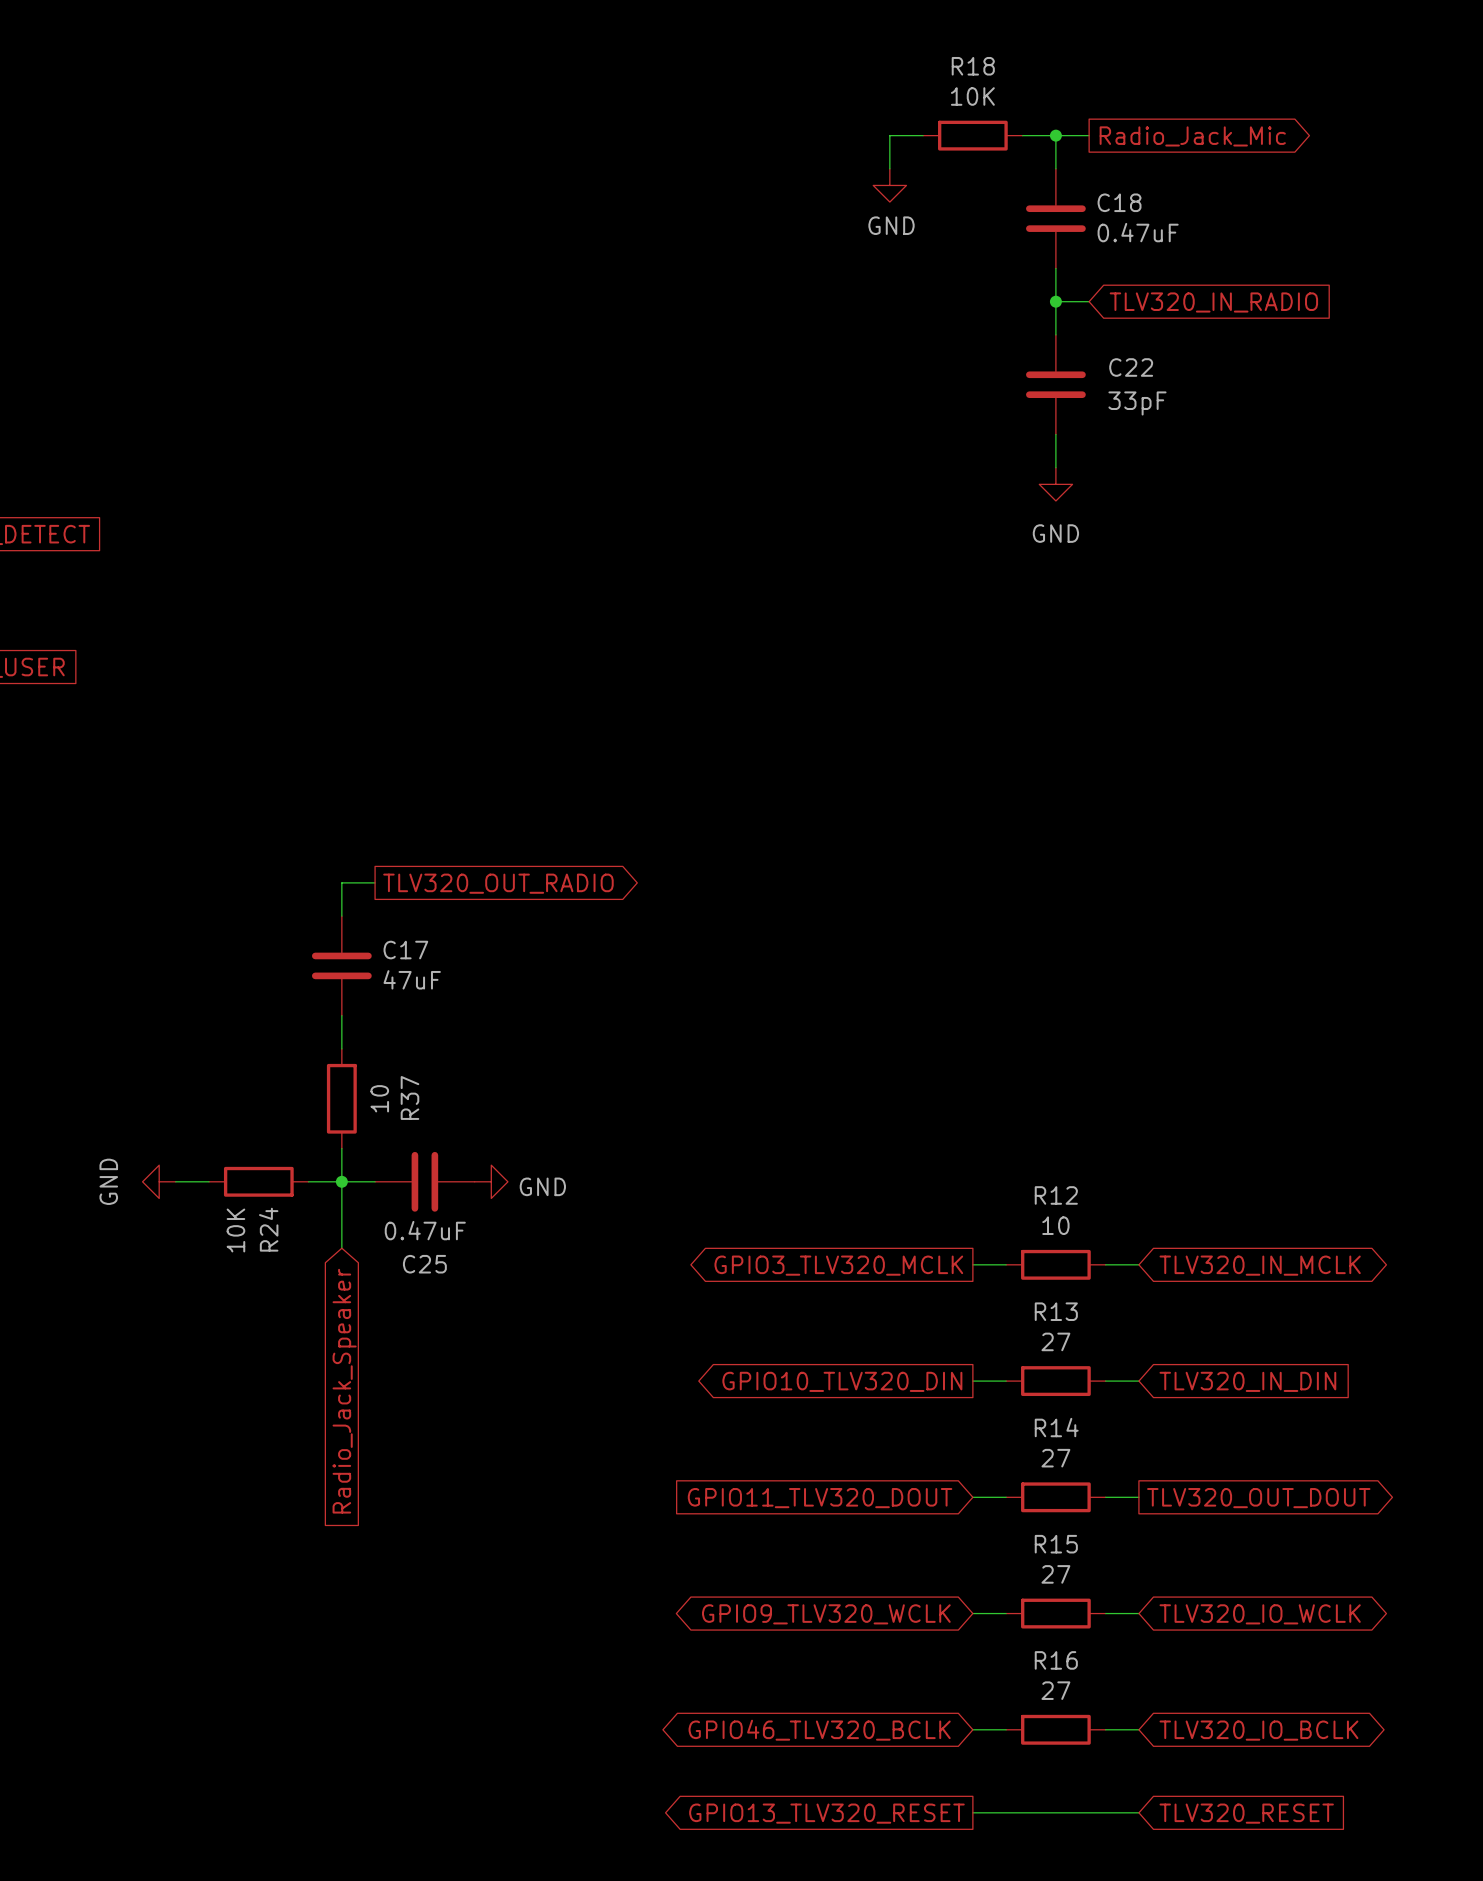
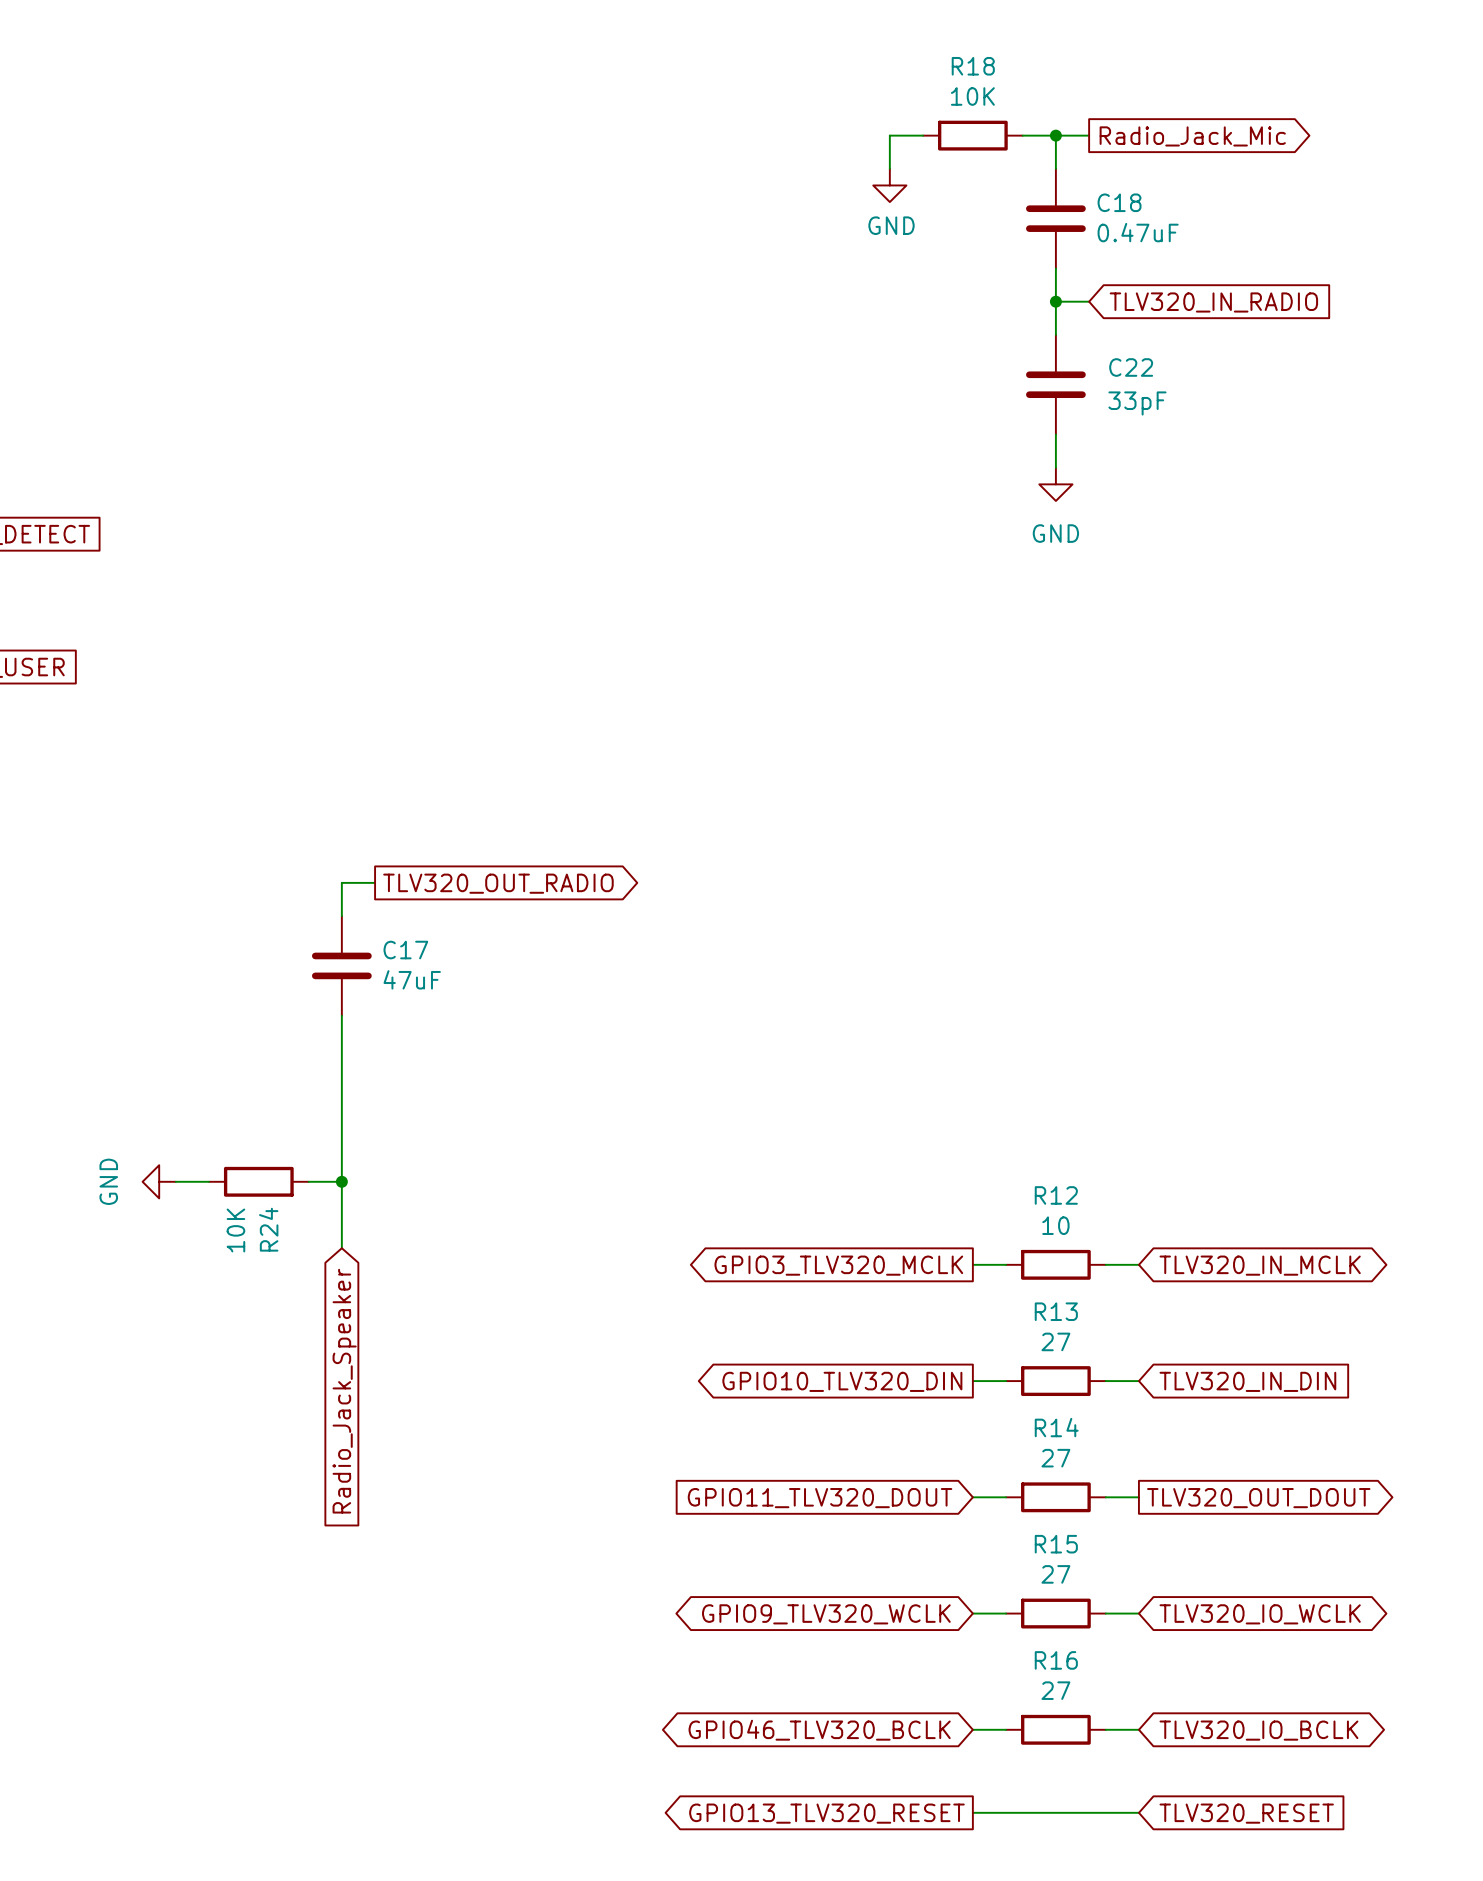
wire: none -> (341, 1048) (341, 1148)
R37: 10 (341, 1098) -> none
wire: (341, 1181) (375, 1181) -> none
C25: 0.47uF (424, 1181) -> none
power symbol: GND (491, 1181) -> none

